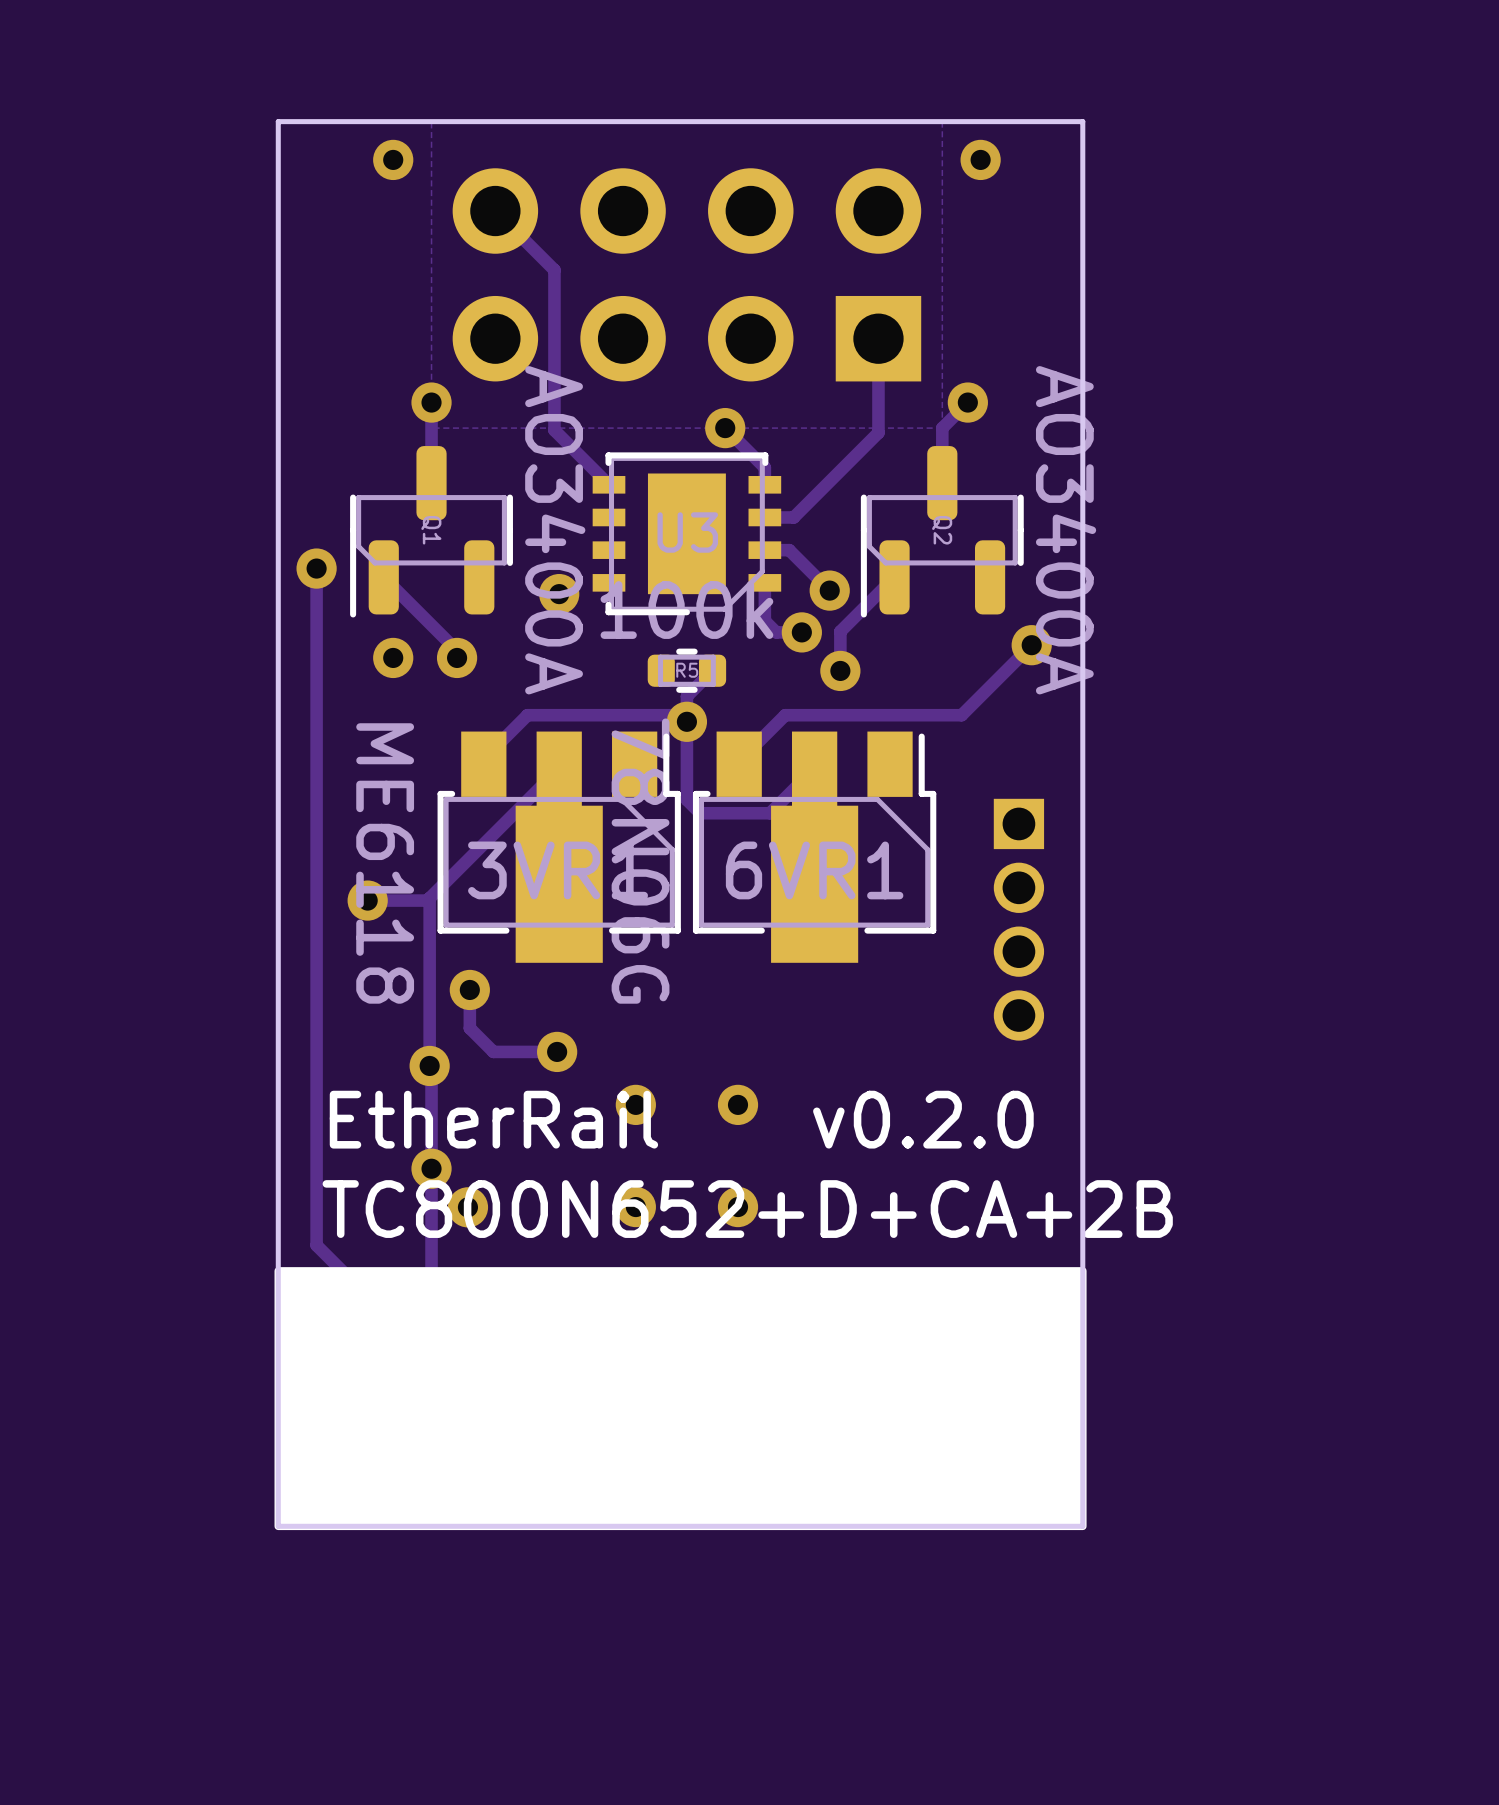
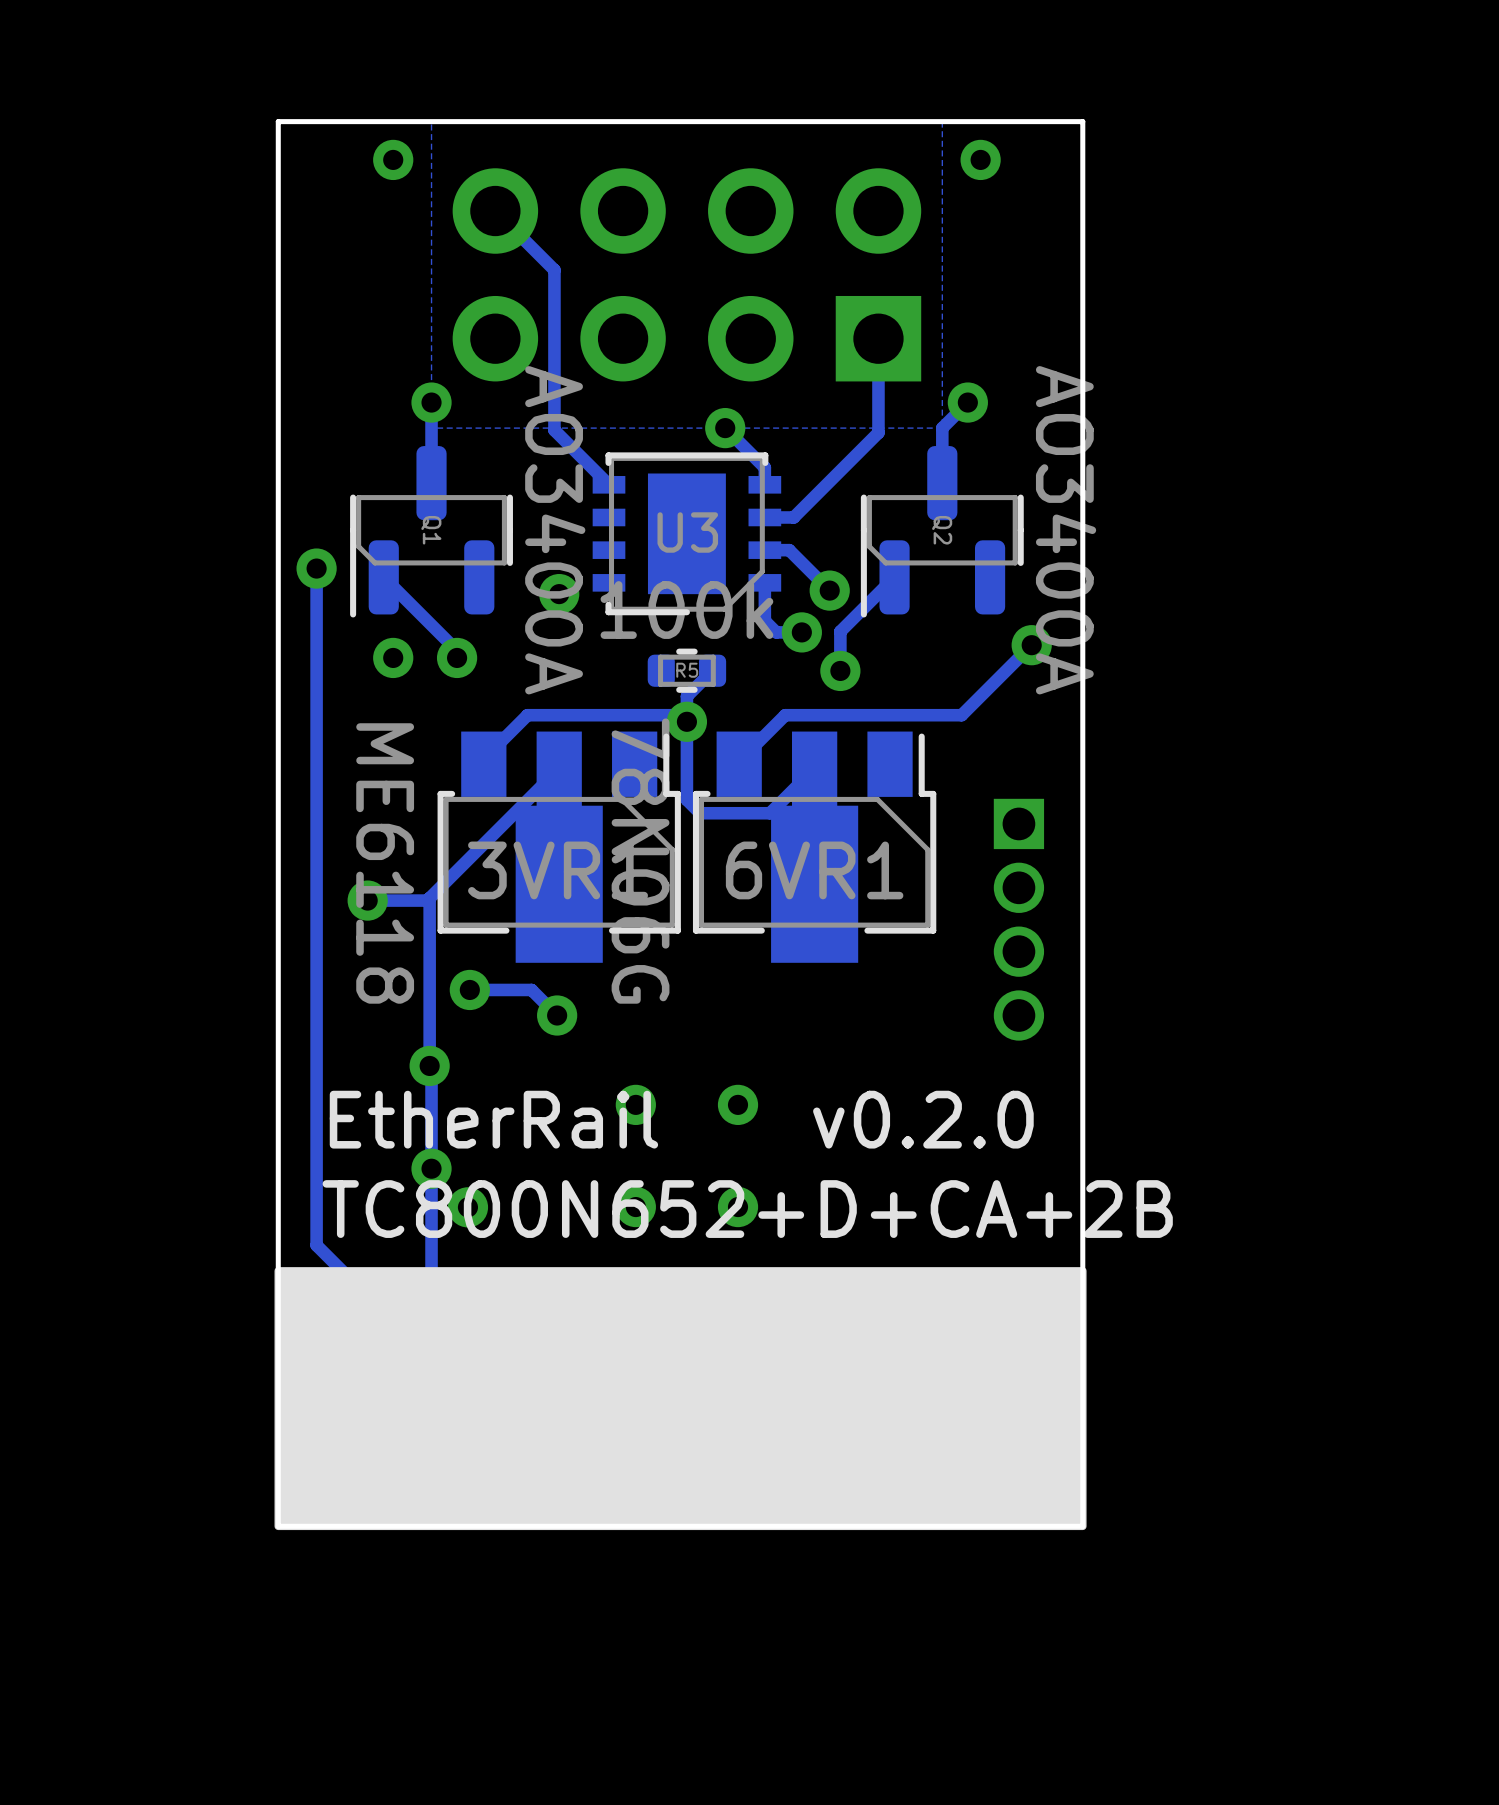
track: (469, 989) (469, 1028) (493, 1051) (557, 1051) -> (469, 989) (531, 989) (557, 1015)
via position: (557, 1051) -> (557, 1015)

